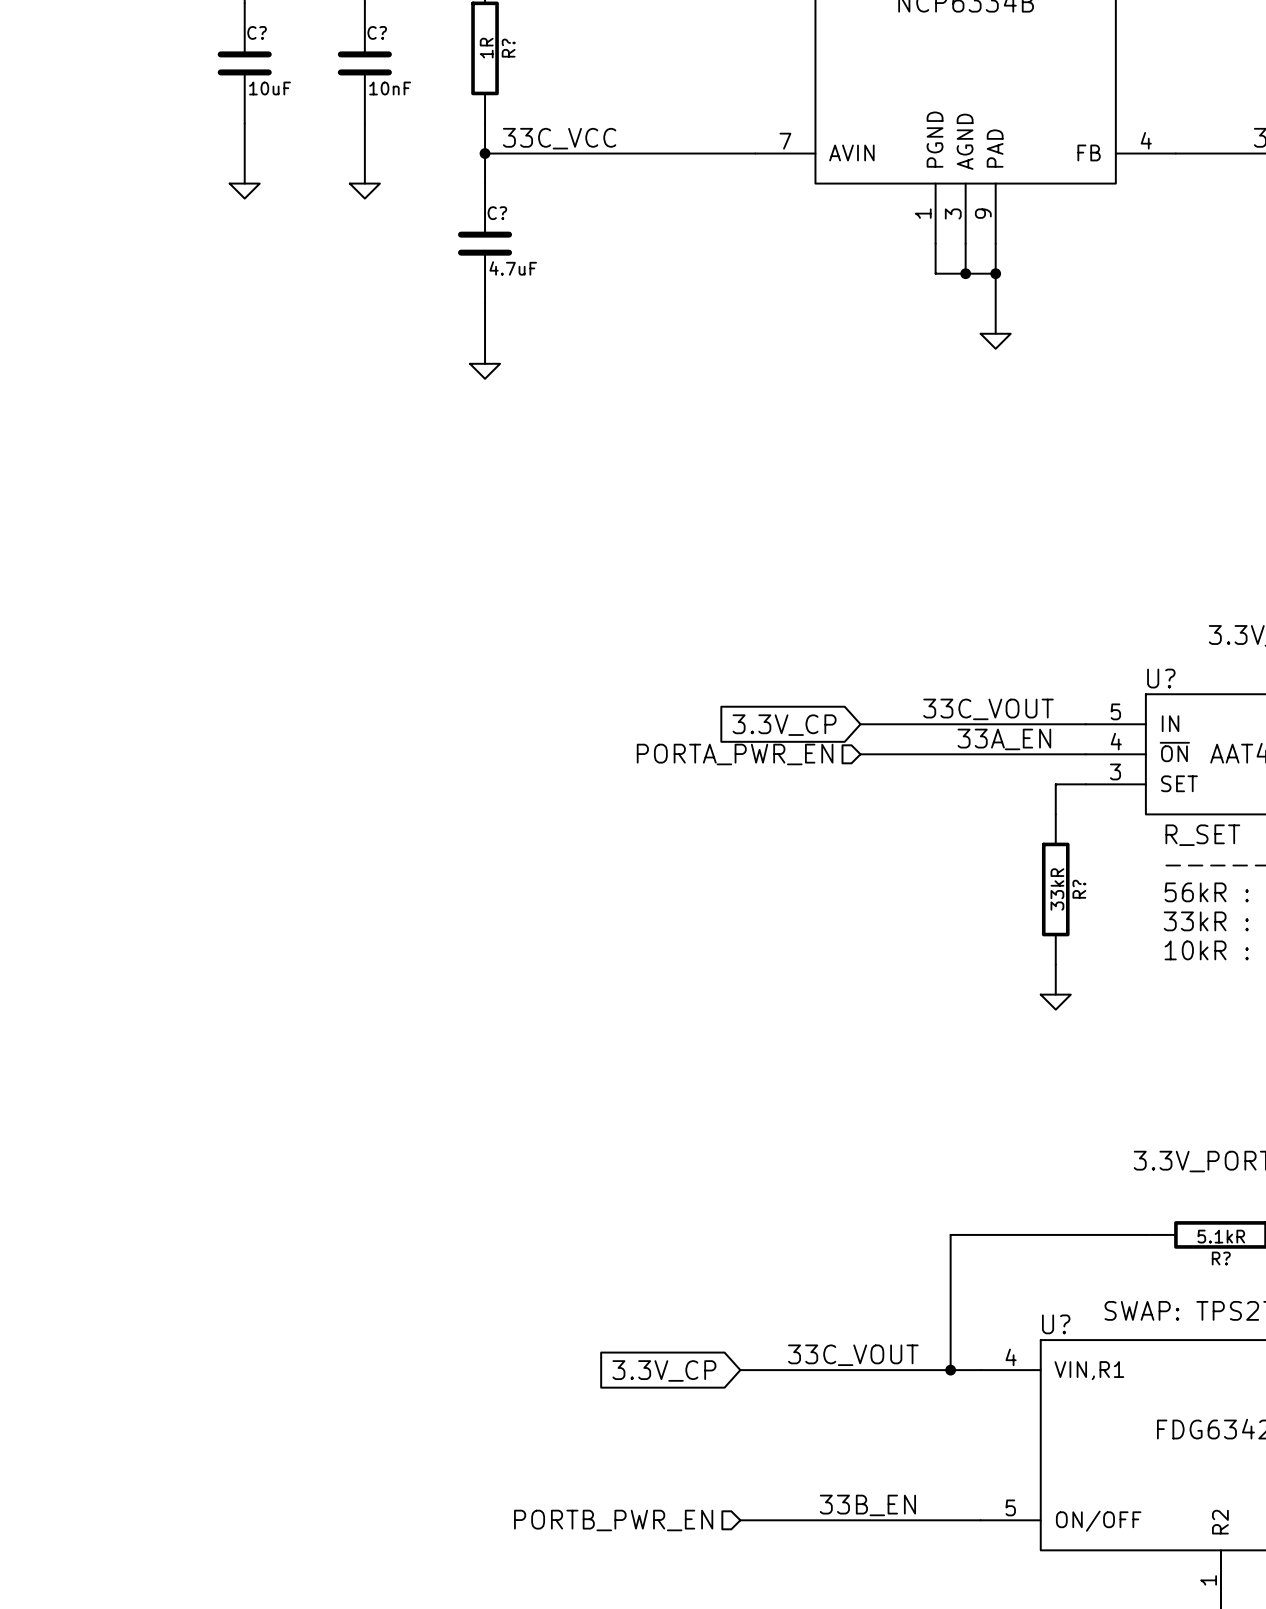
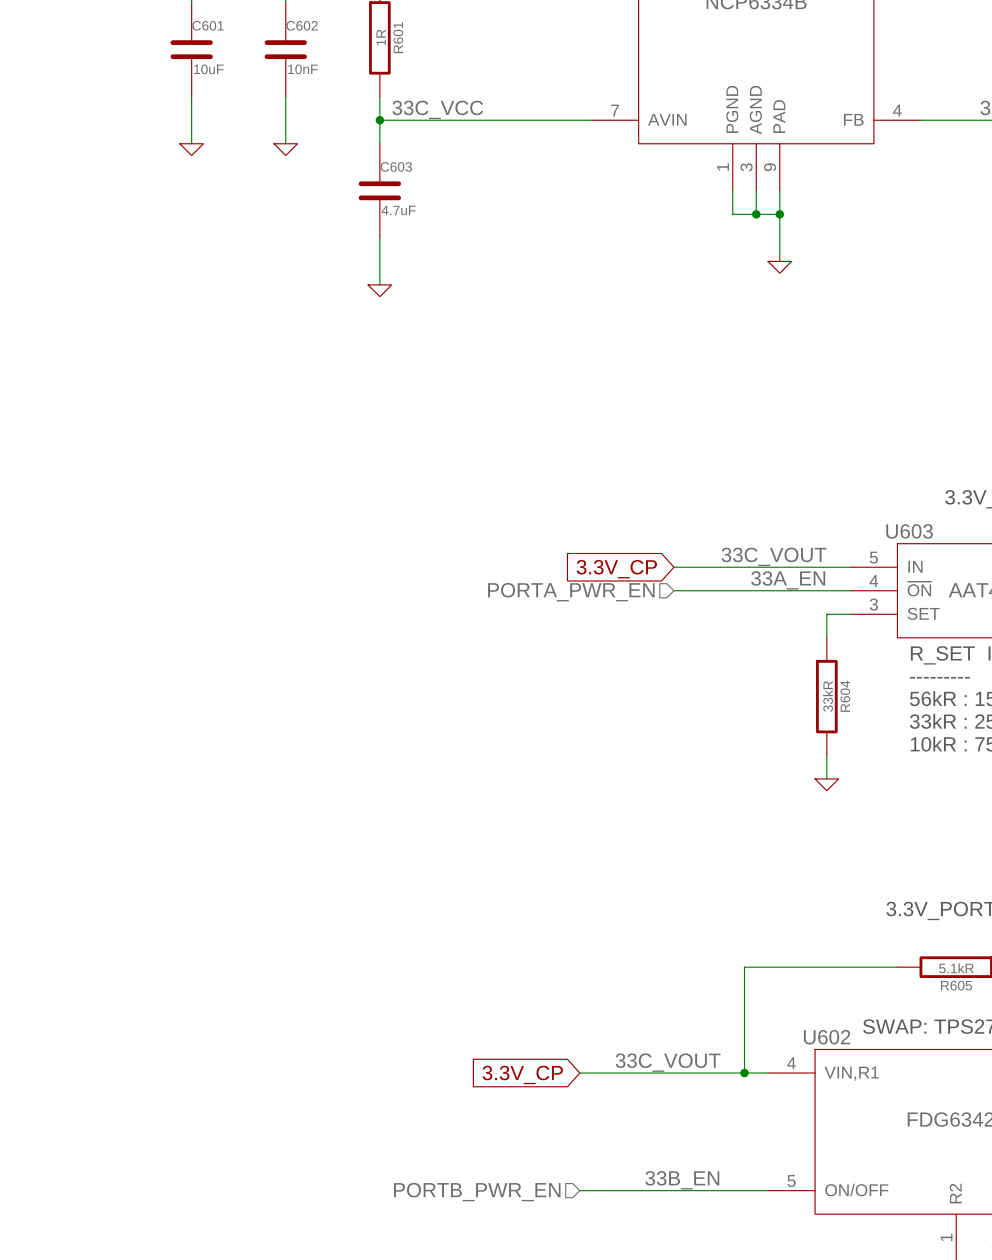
C? name: C? (257, 32) -> C601 (208, 25)
C? name: C? (377, 32) -> C602 (302, 25)
R? name: R? (508, 48) -> R601 (398, 37)
C? name: C? (497, 213) -> C603 (396, 166)
U? name: U? (1161, 678) -> U603 (909, 531)
R? name: R? (1079, 889) -> R604 (845, 696)
R? name: R? (1221, 1258) -> R605 (956, 985)
U? name: U? (1056, 1324) -> U602 (827, 1037)

